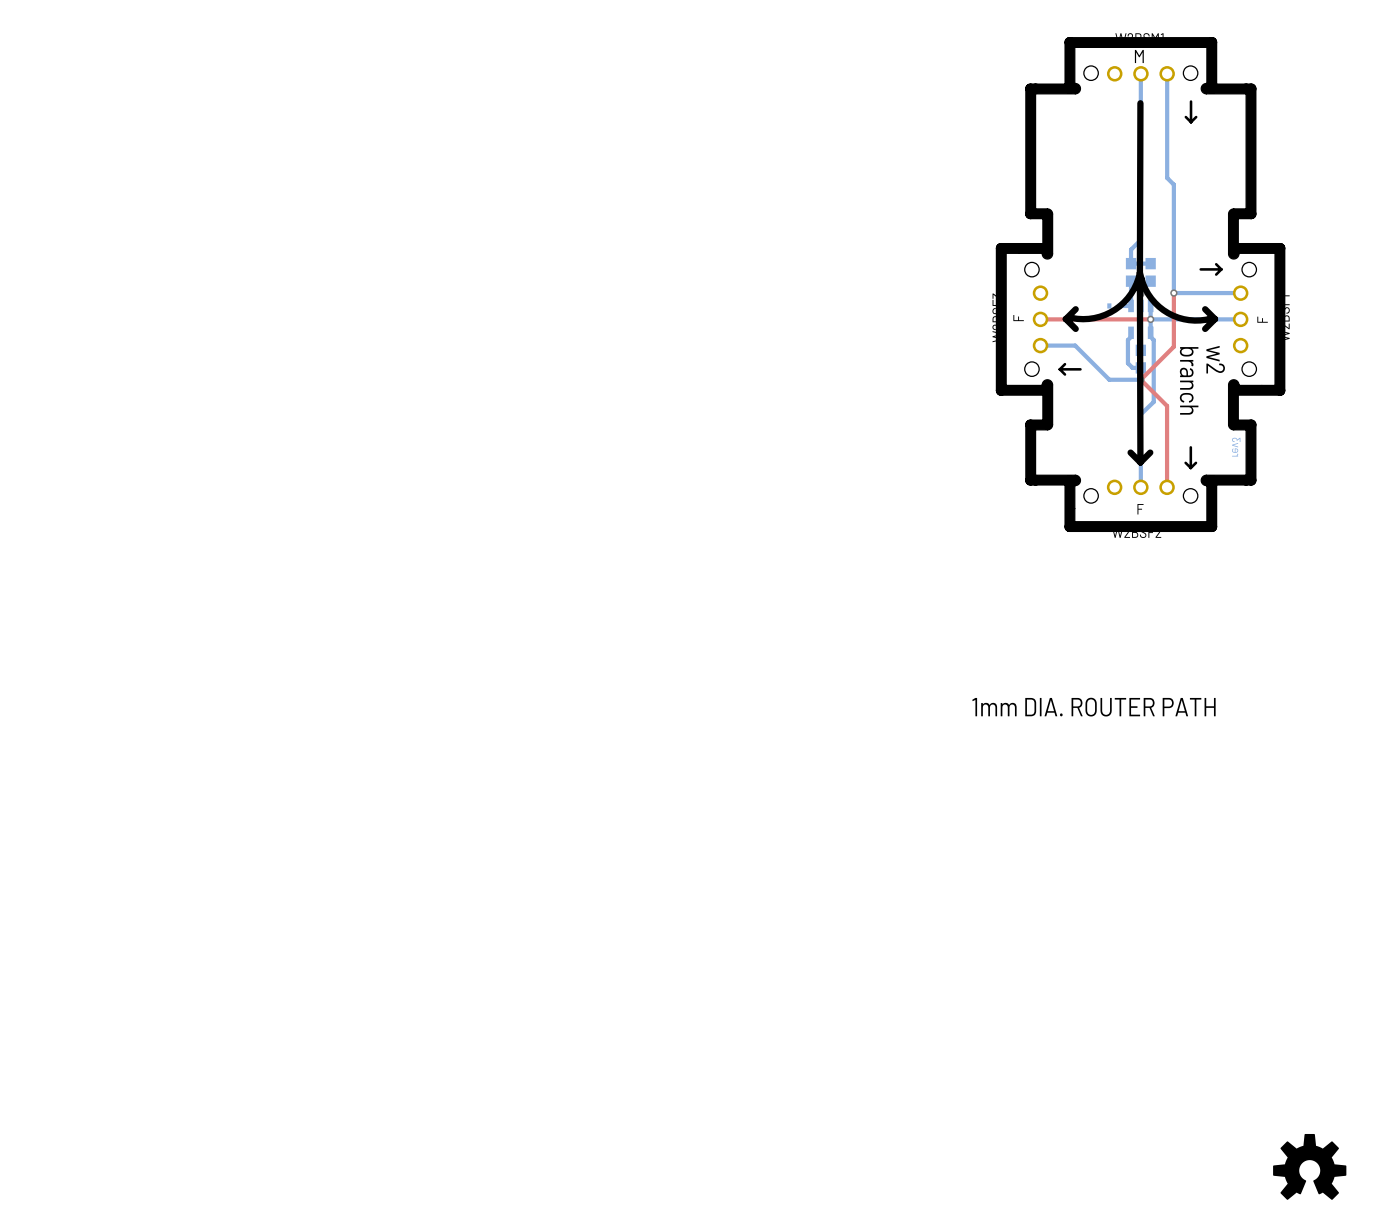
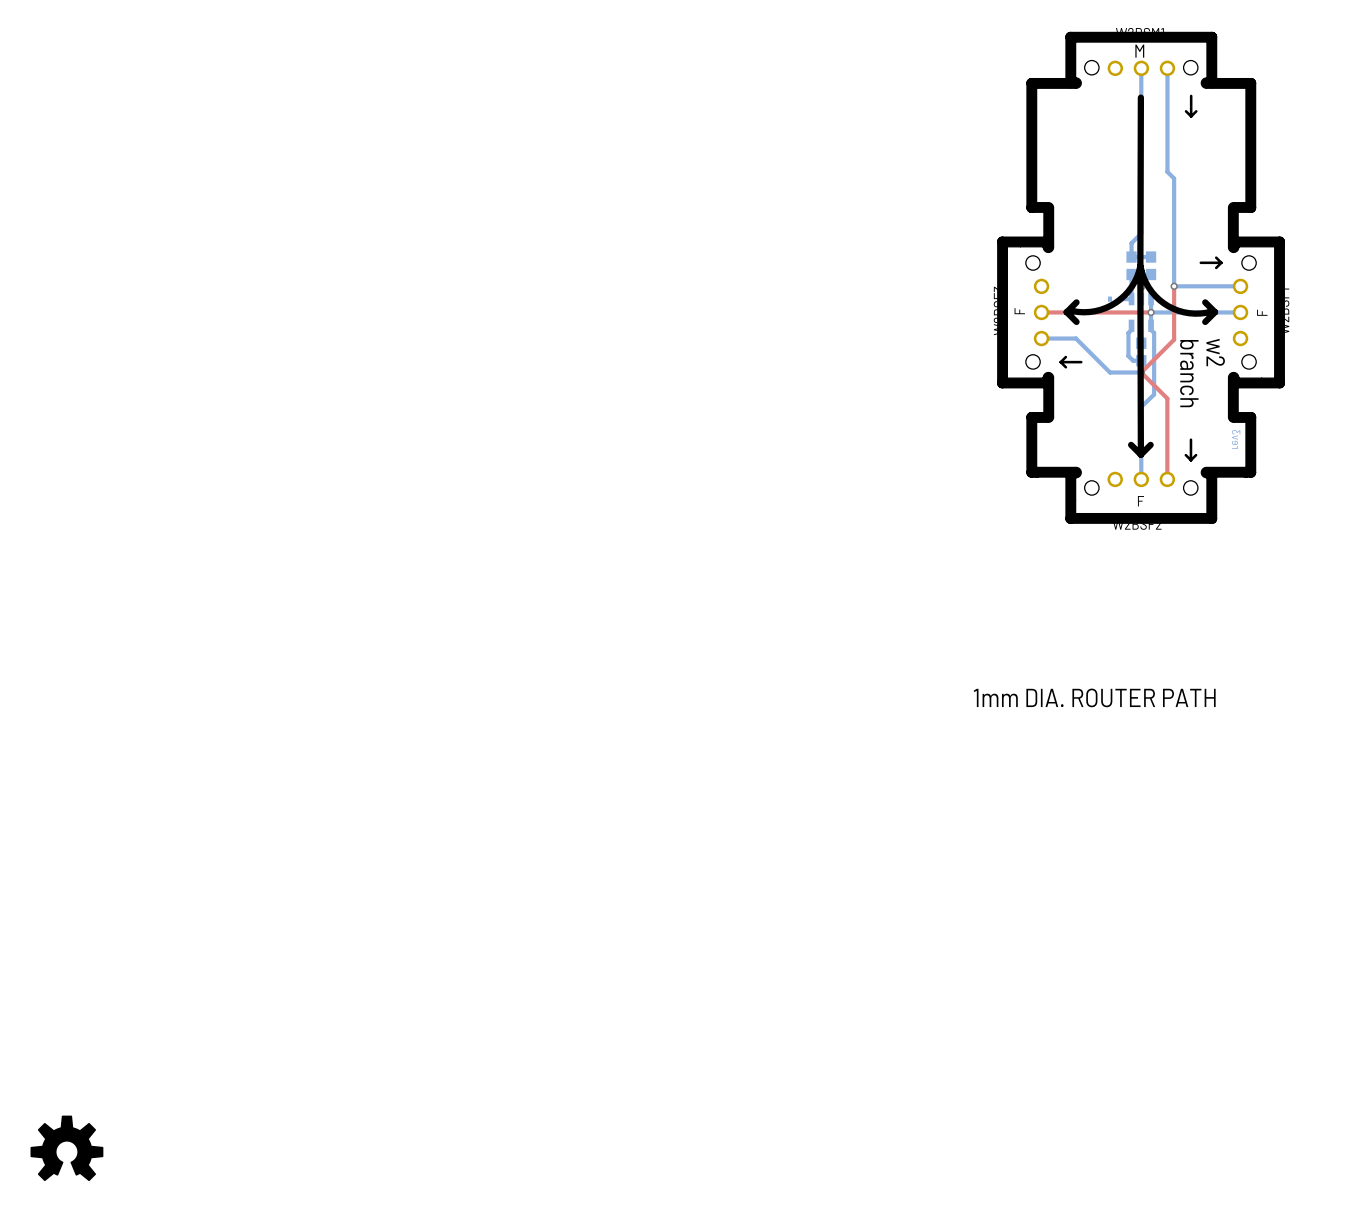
drawing: none -> [30, 1115, 104, 1182]
drawing: [1273, 1133, 1347, 1200] -> none

